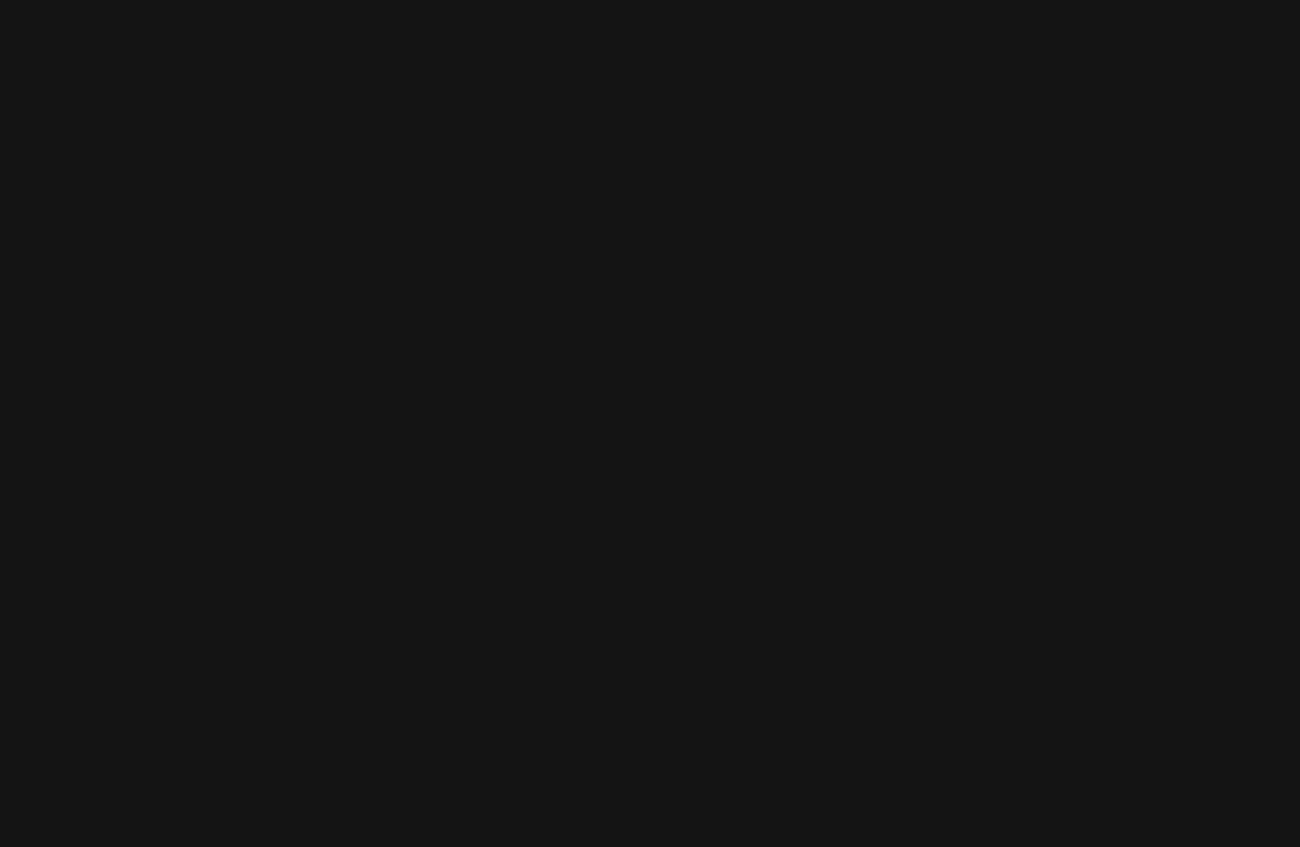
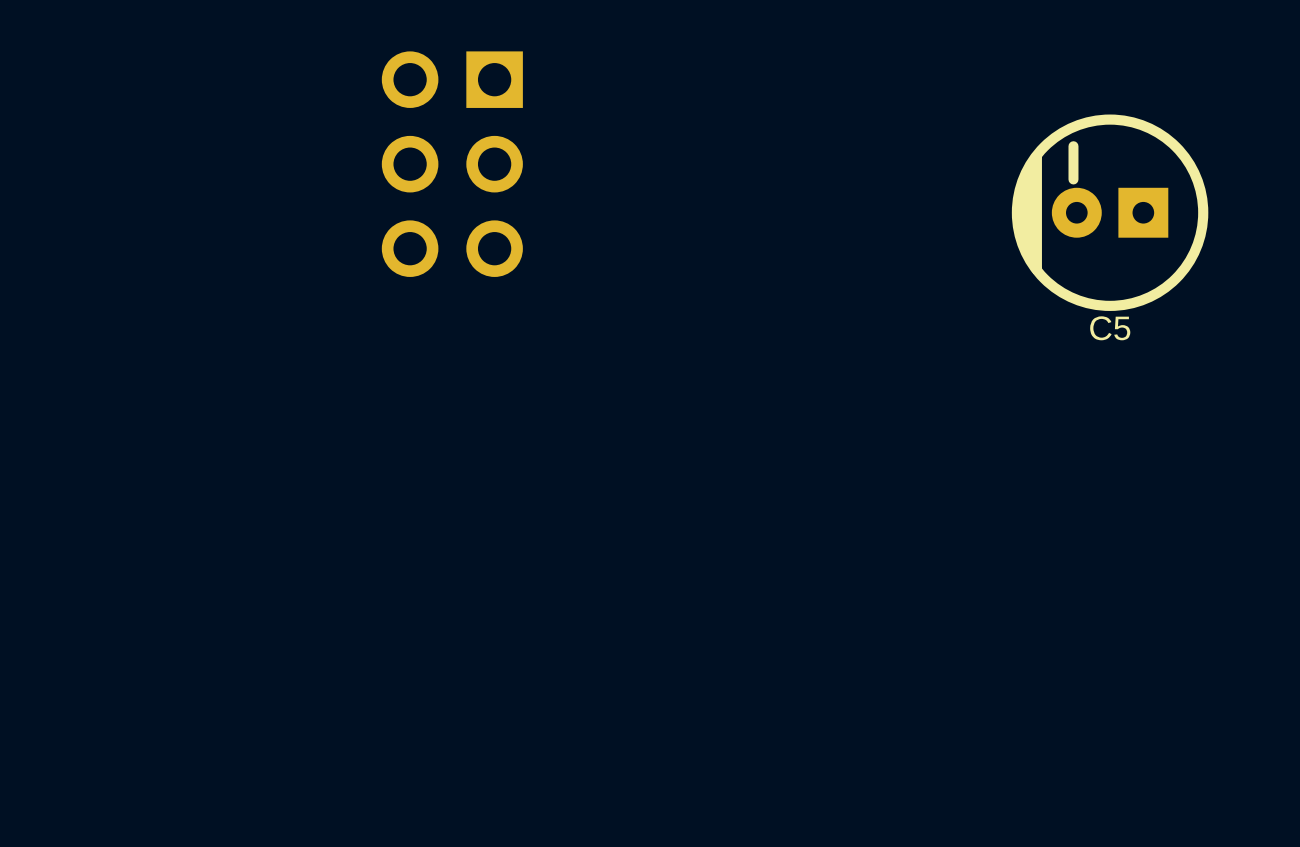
part: none -> (452, 164)
C5: none -> (1110, 212)

